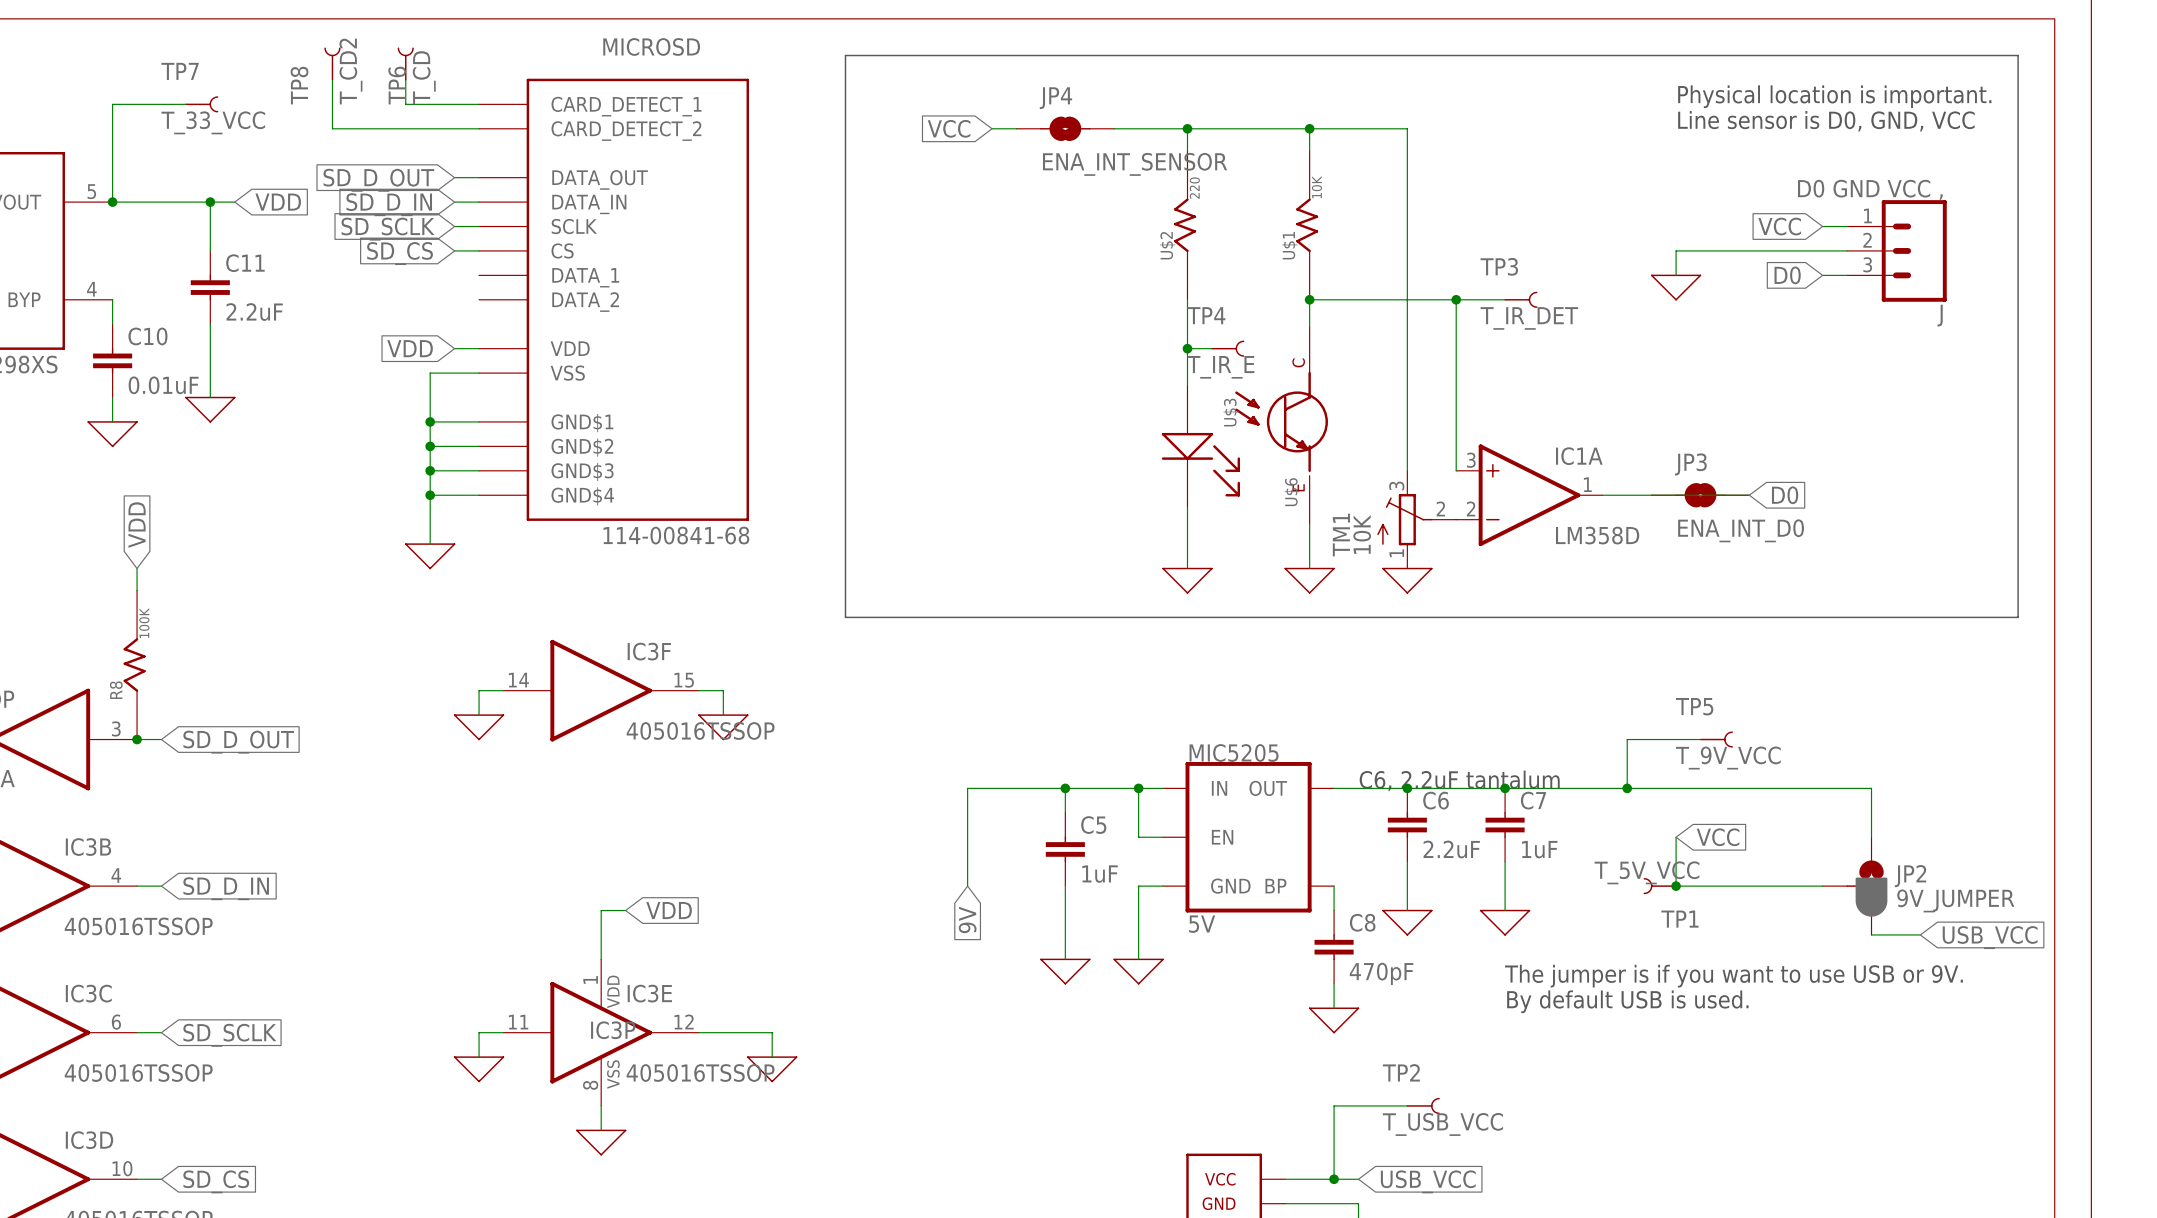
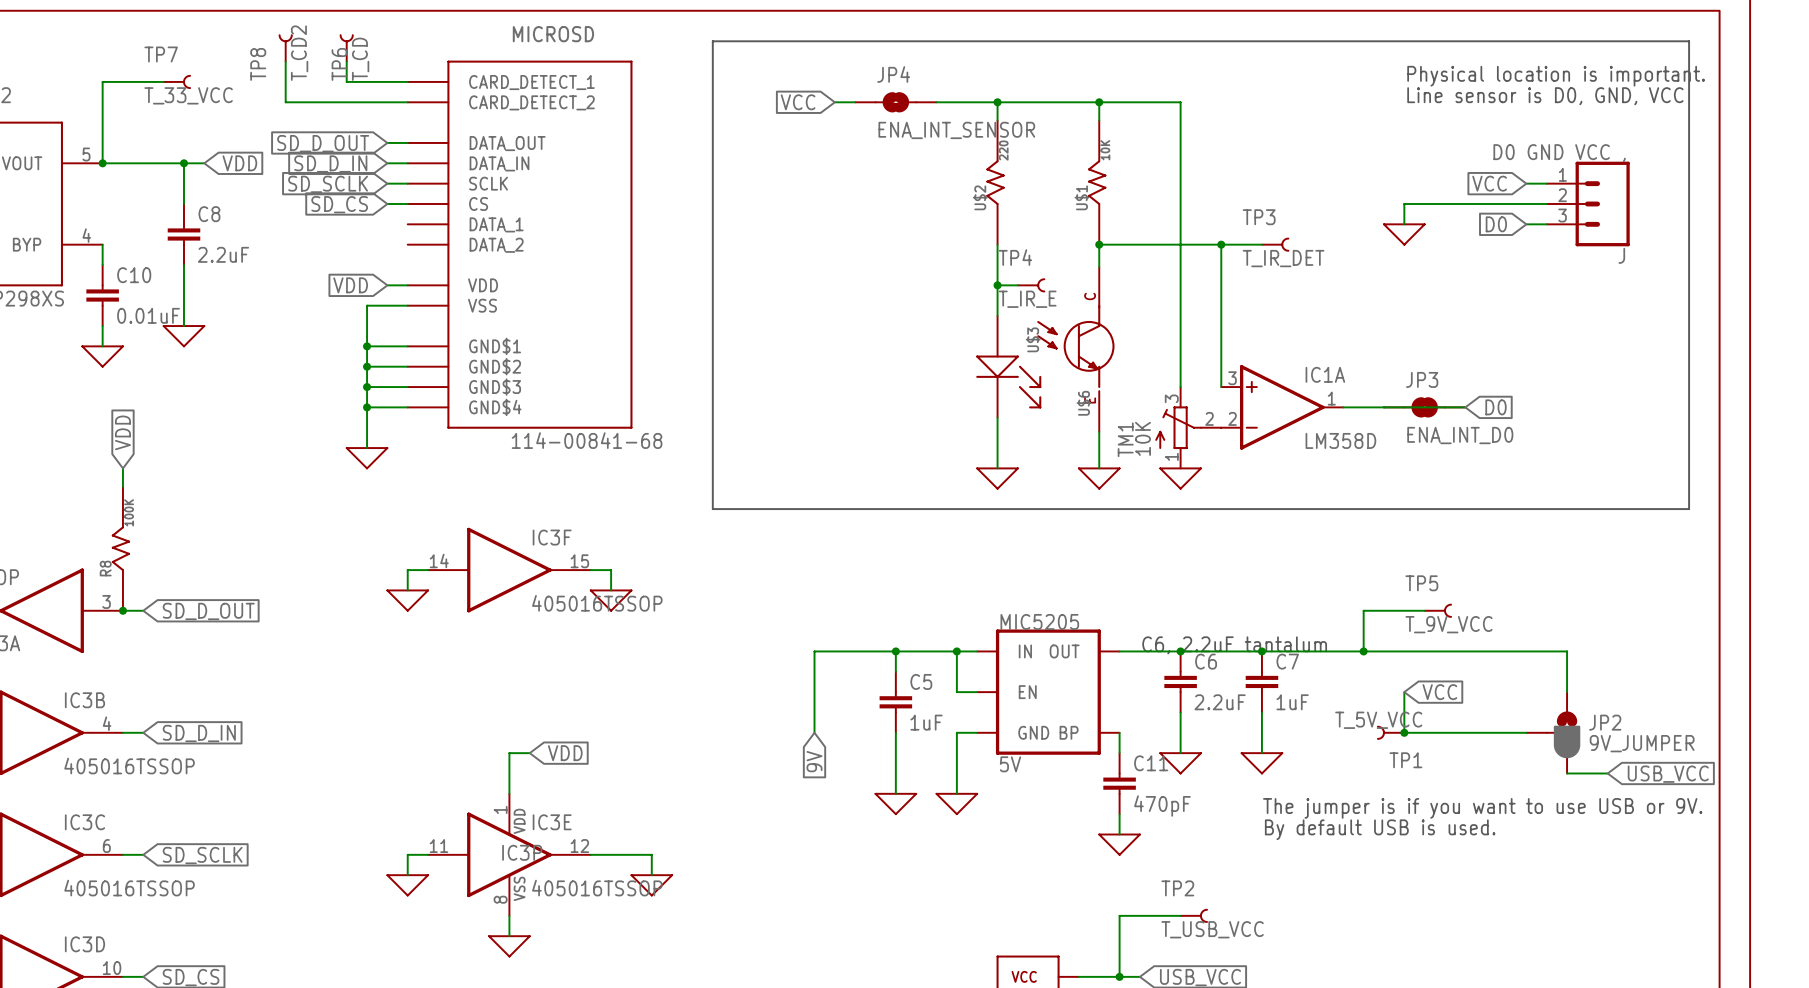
C11 name: C11 (245, 263) -> C8 (209, 214)
C8 name: C8 (1362, 922) -> C11 (1151, 763)

